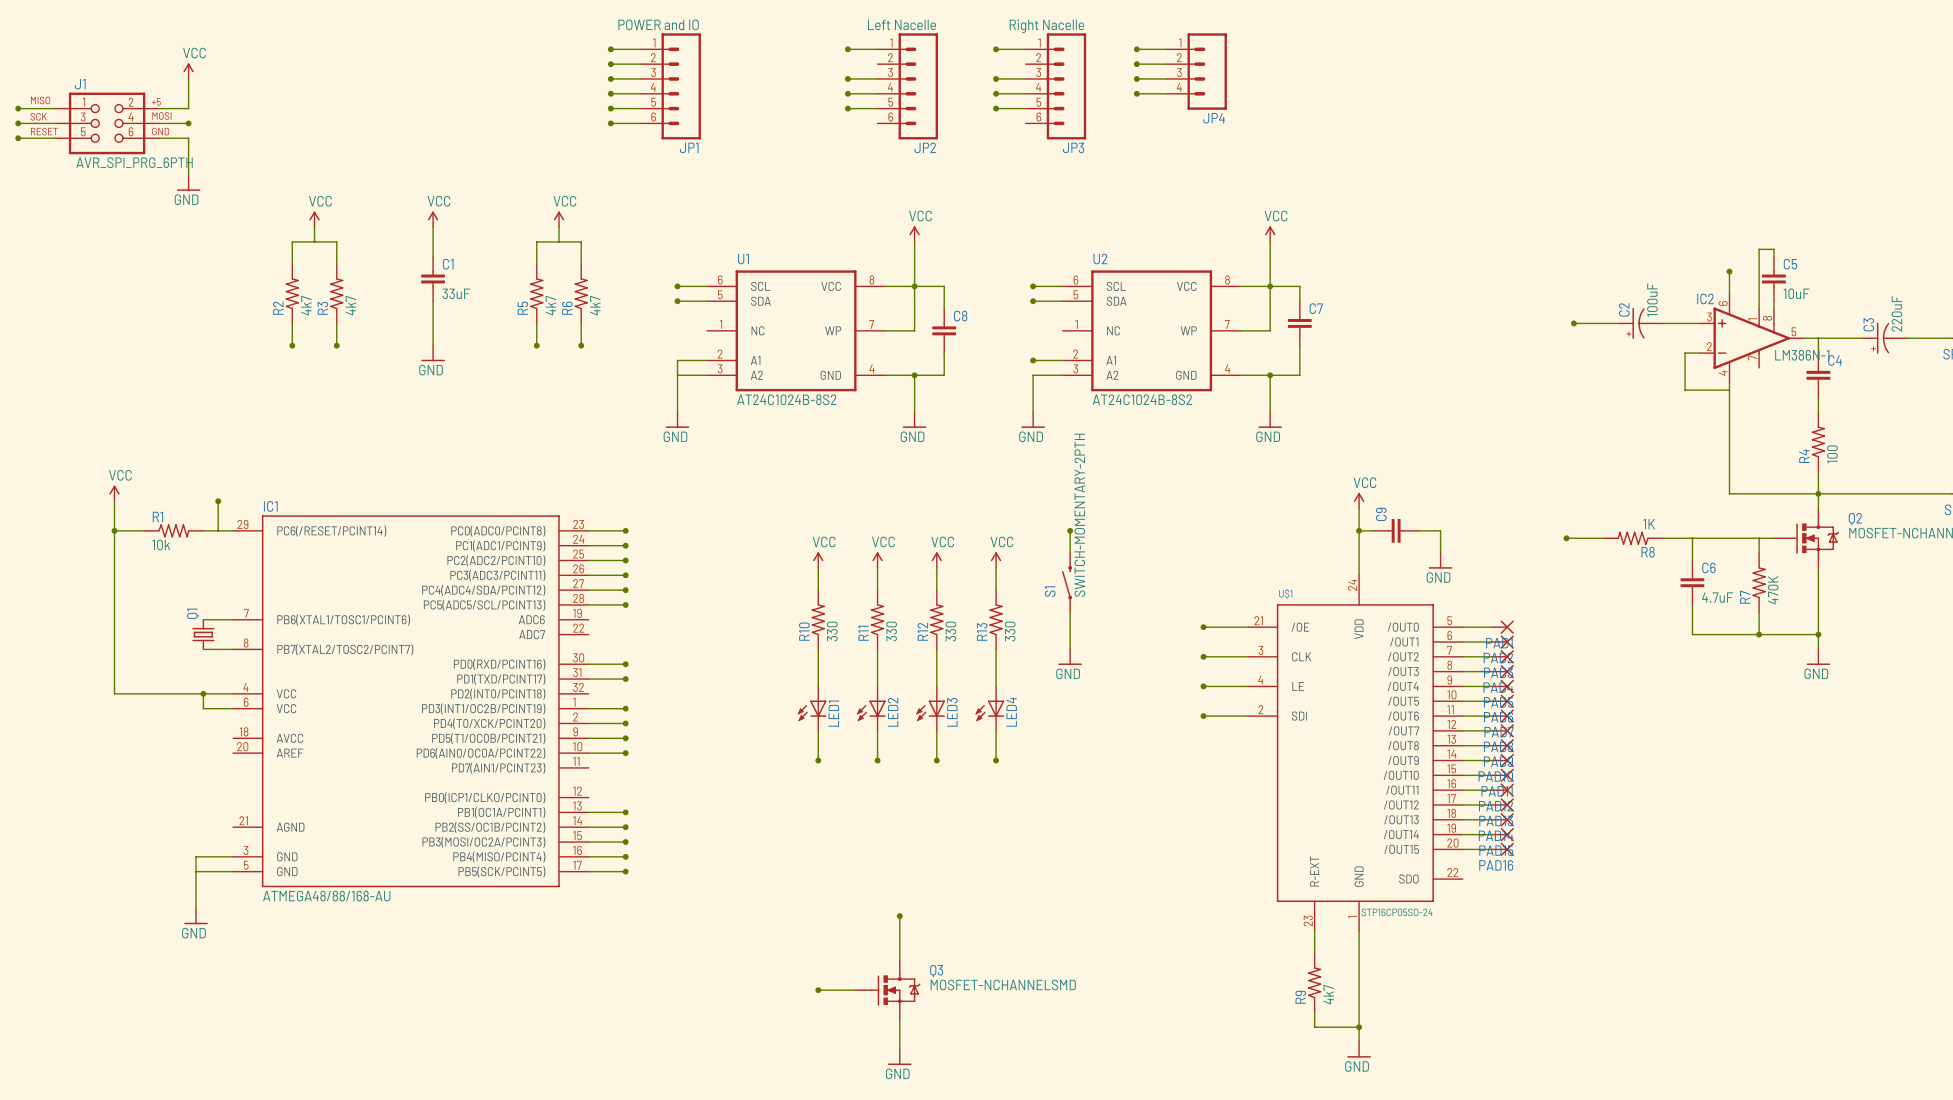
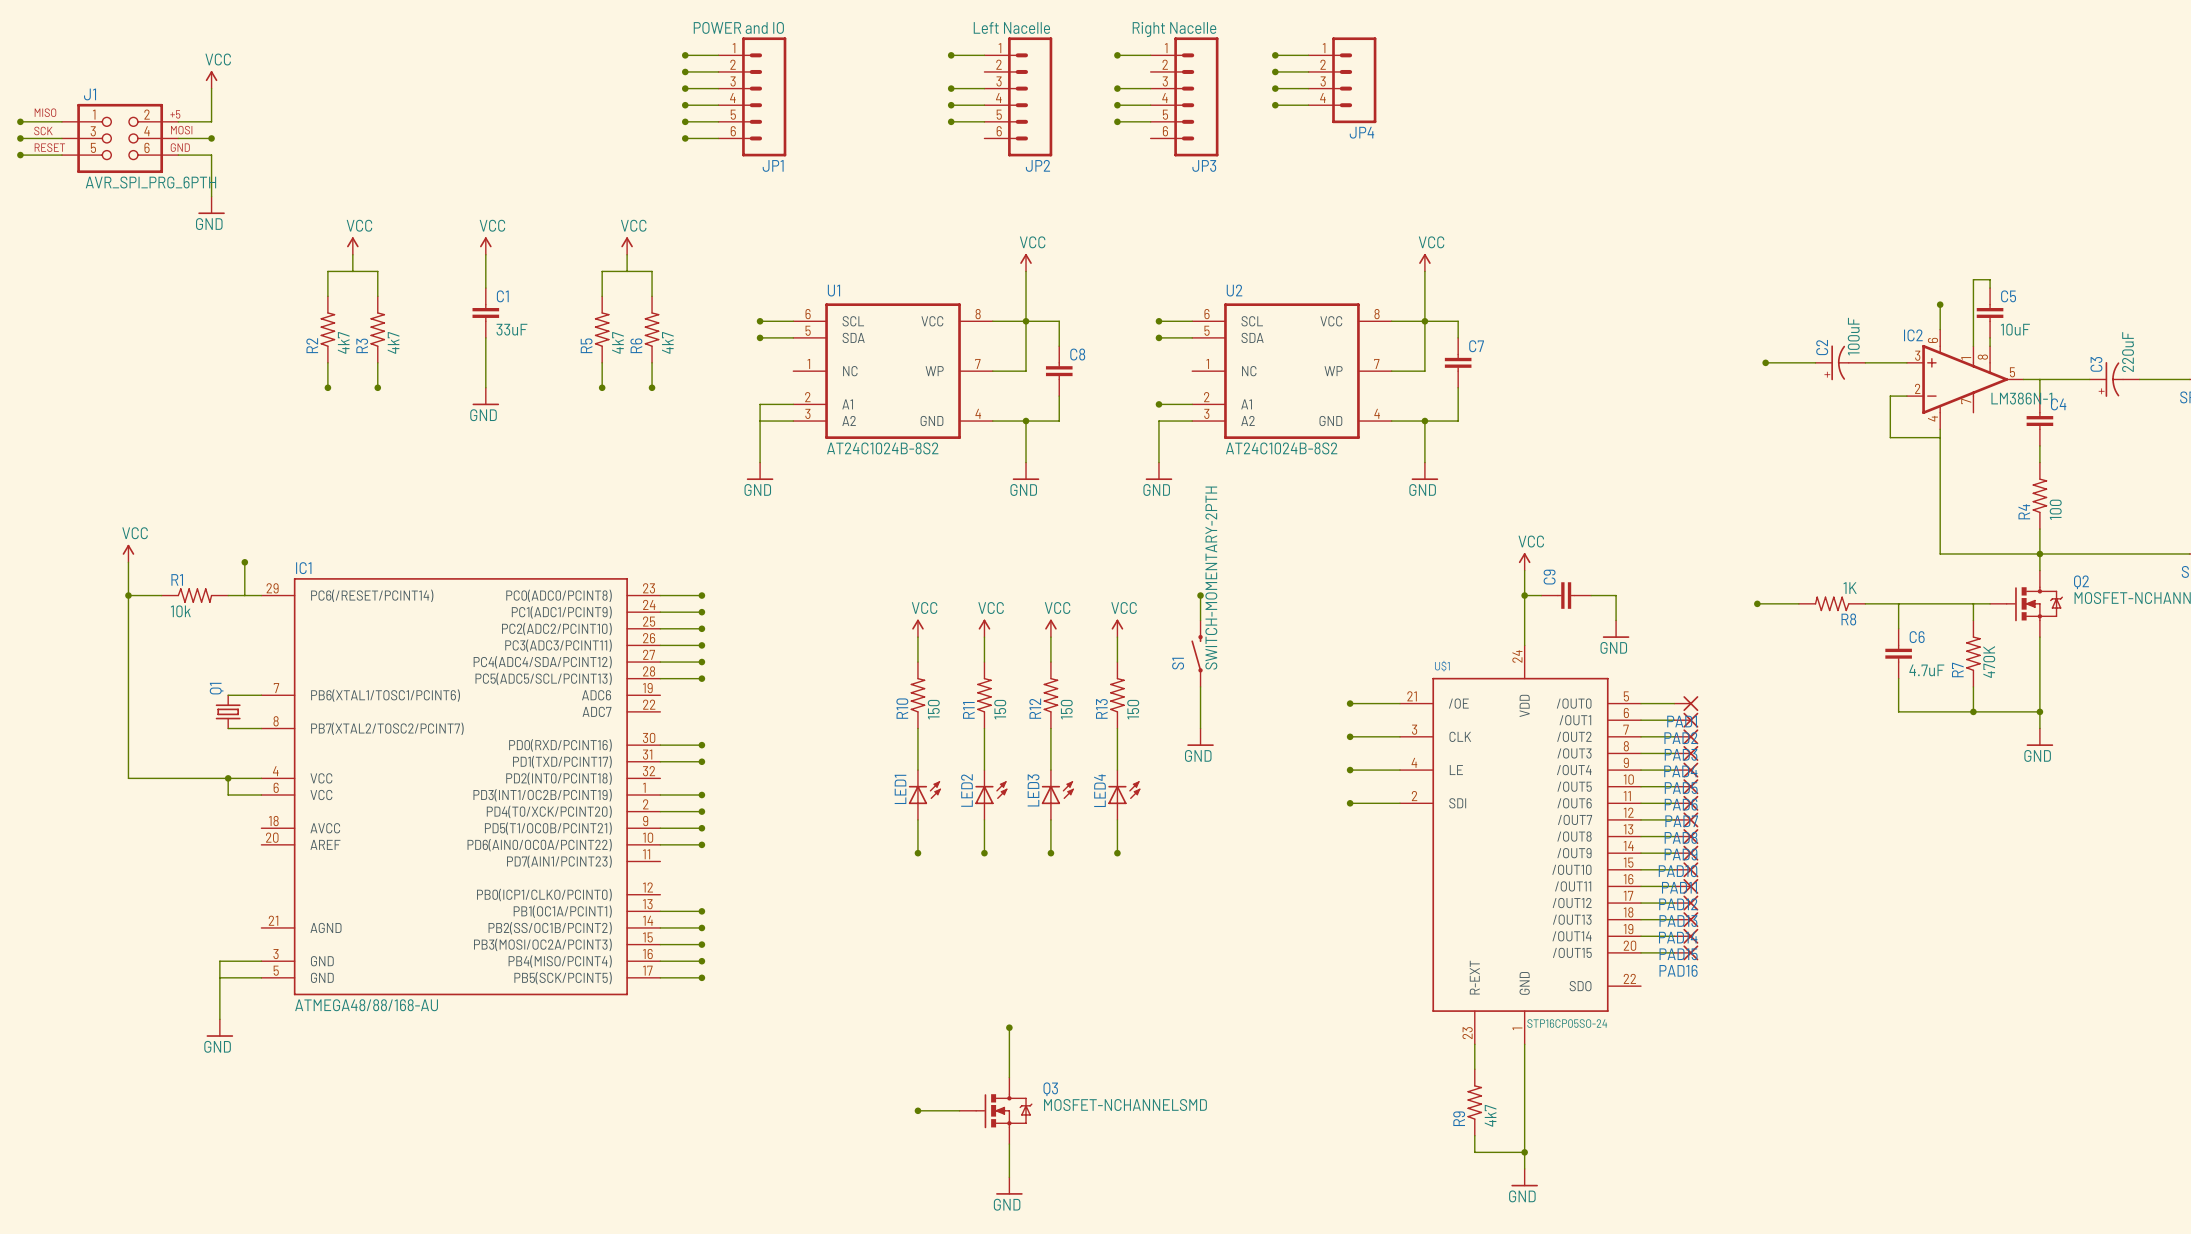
R10 value: 330 (832, 631) -> 150 (933, 709)
R11 value: 330 (891, 631) -> 150 (1000, 709)
R12 value: 330 (950, 631) -> 150 (1066, 709)
R13 value: 330 (1010, 631) -> 150 (1133, 709)
LED1 rotation: 0° (812, 710) -> 180° (924, 792)
LED2 rotation: 0° (871, 710) -> 180° (991, 792)
LED3 rotation: 0° (930, 710) -> 180° (1057, 792)
LED4 rotation: 0° (989, 710) -> 180° (1124, 792)

